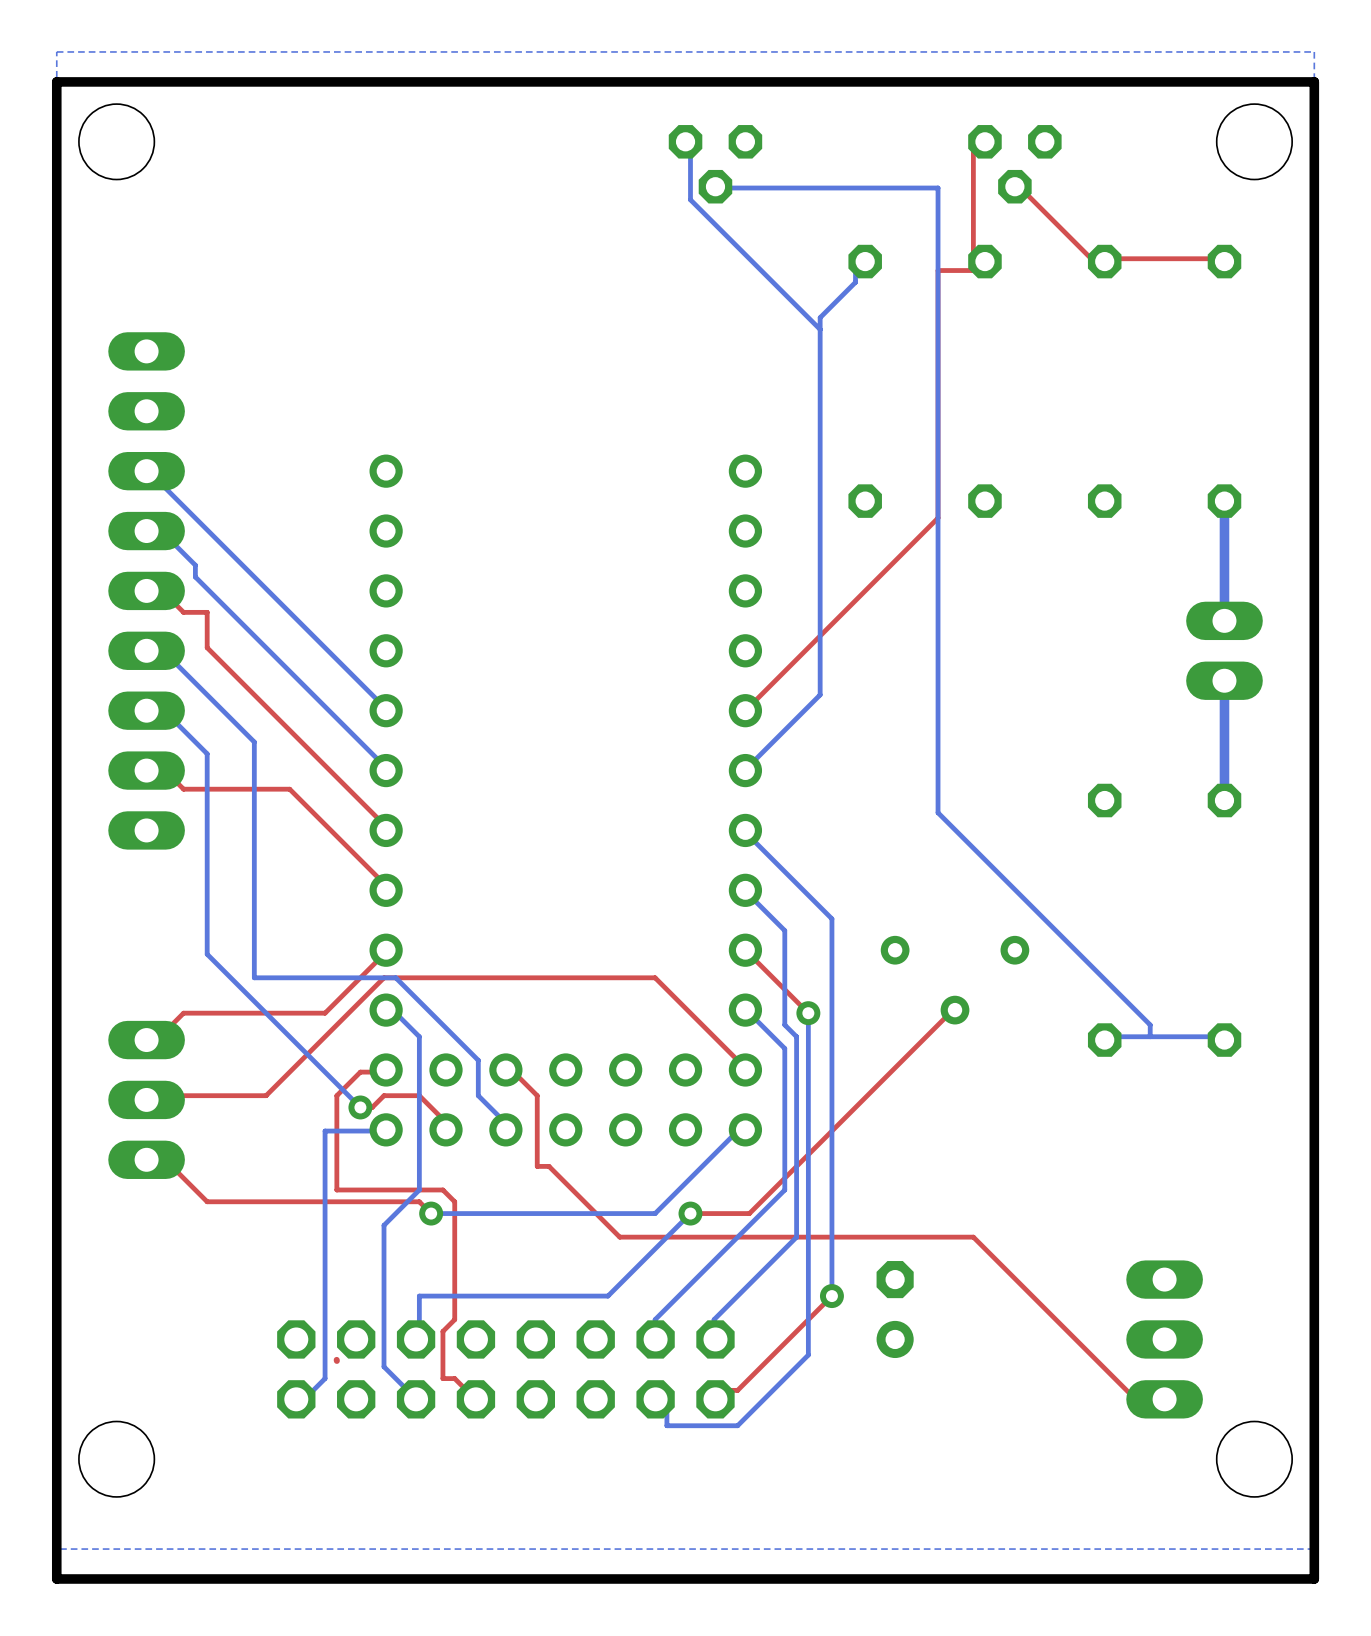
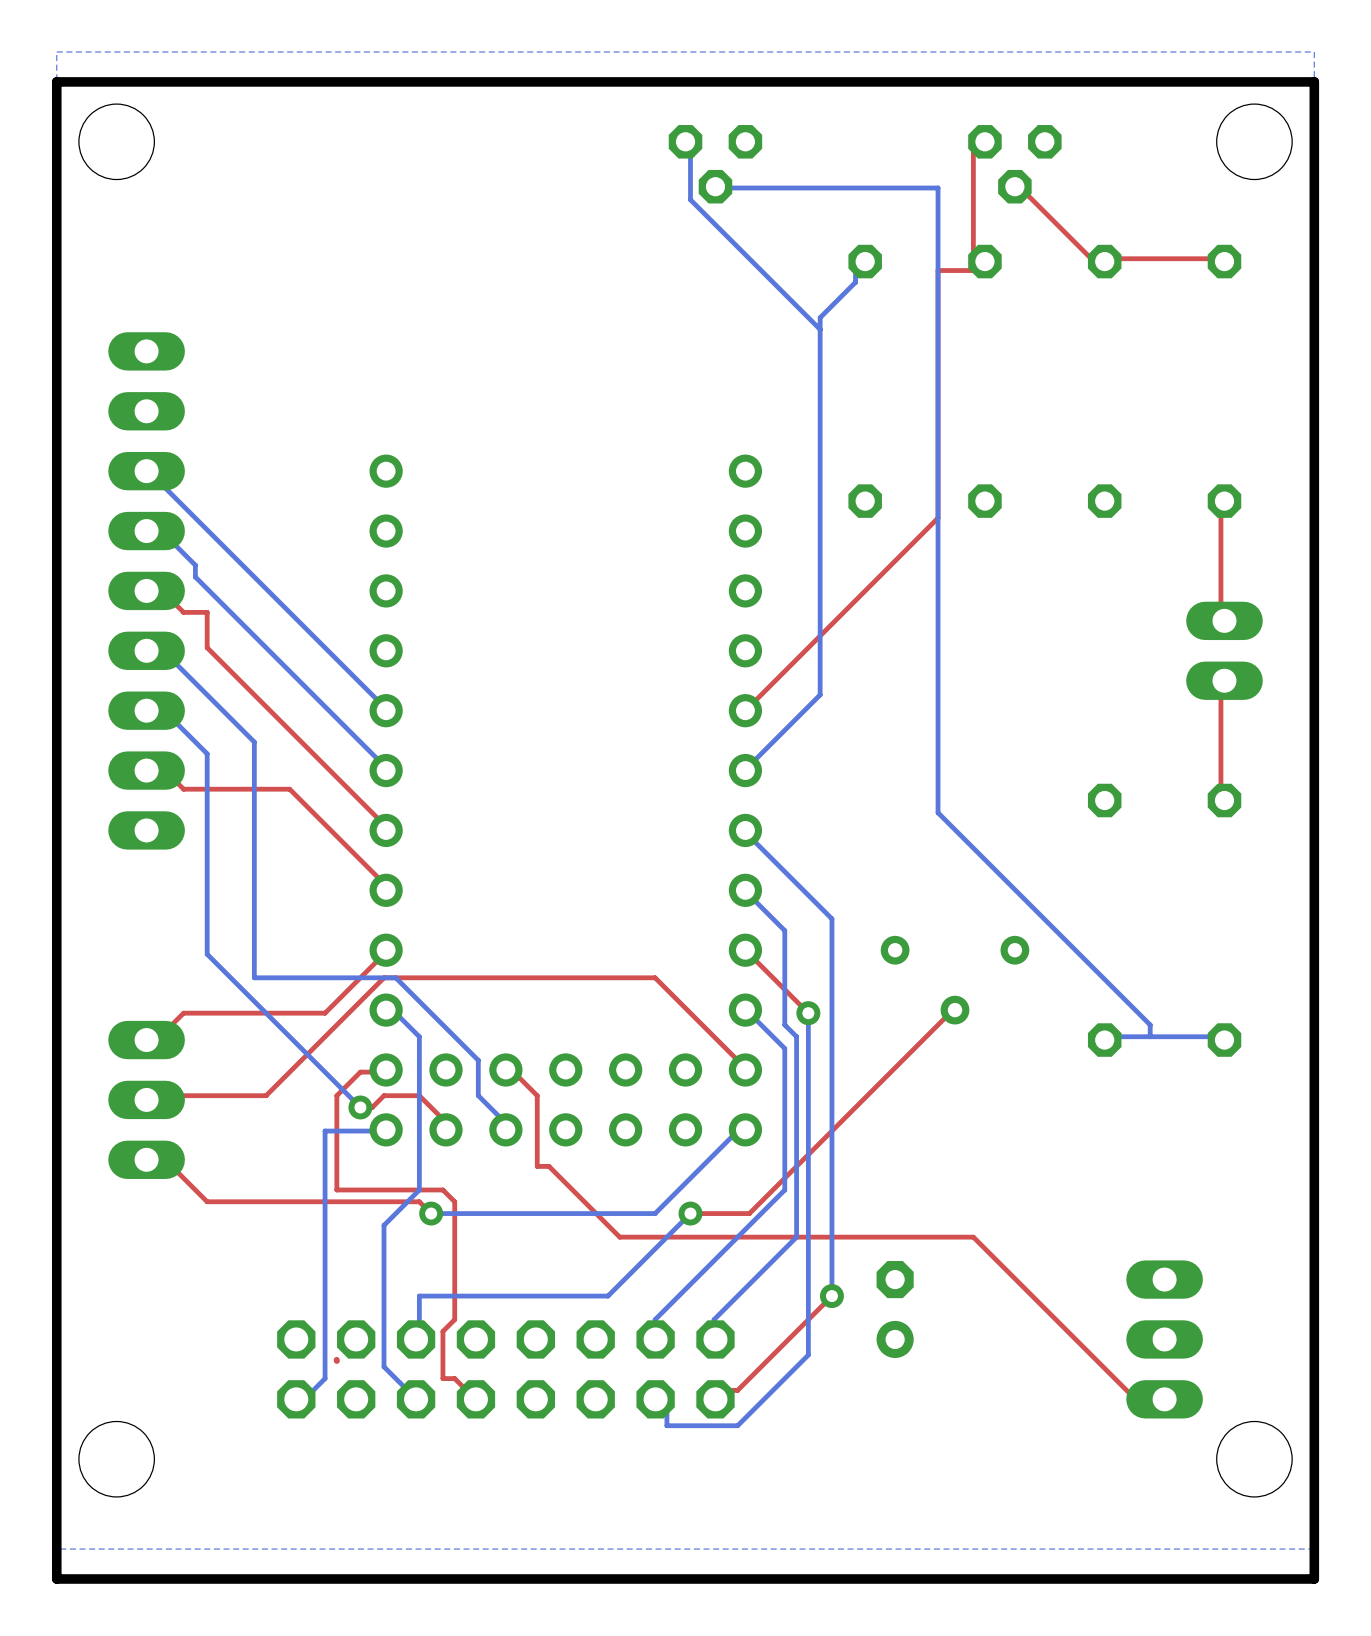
bottom track: (1224, 501) (1224, 620) -> none
top track: none -> (1224, 501) (1220, 506) (1220, 612) (1224, 620)
bottom track: (1224, 680) (1224, 800) -> none
top track: none -> (1224, 680) (1220, 683) (1220, 789) (1224, 800)

